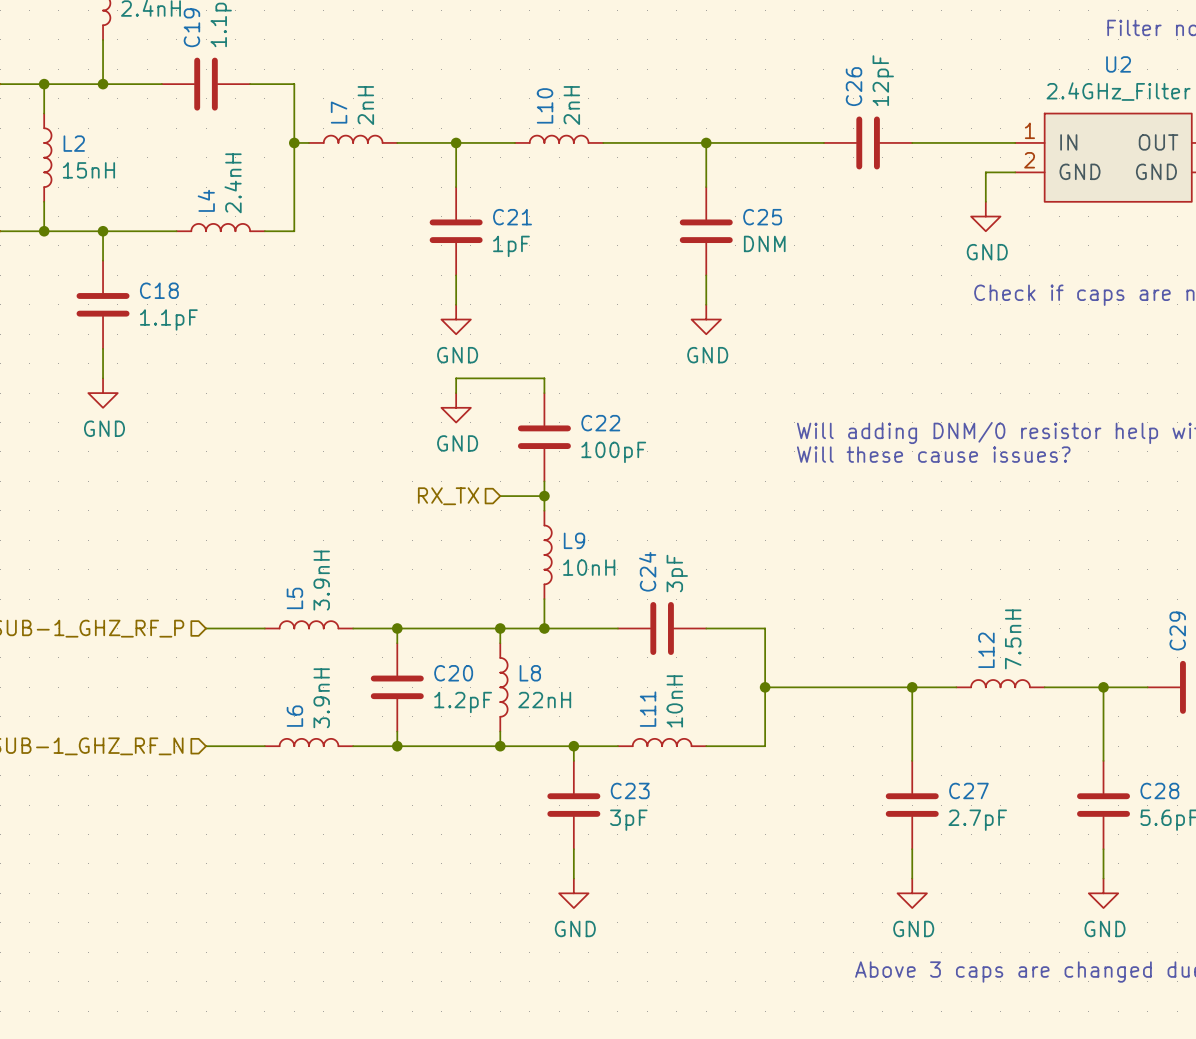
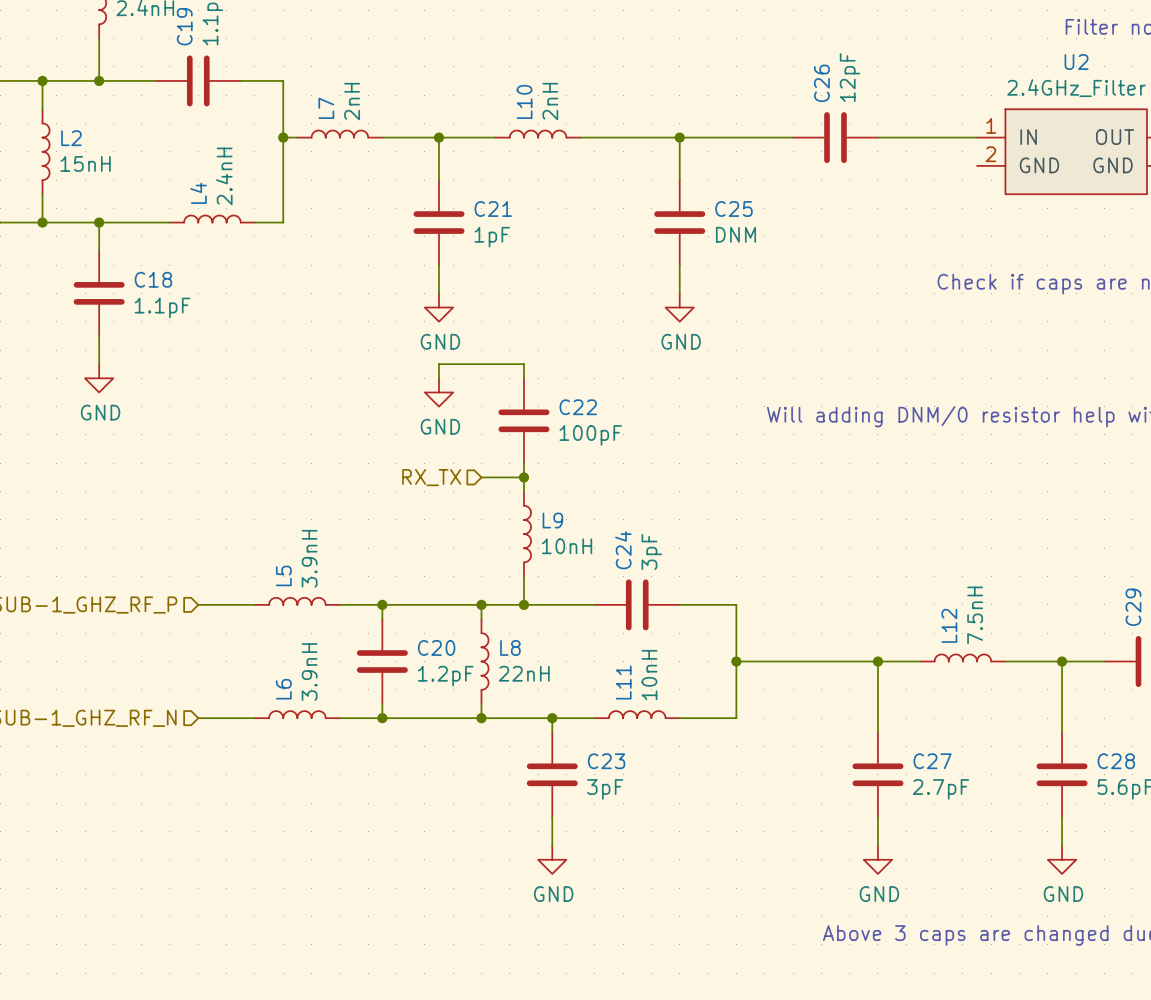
wire: (1015, 172) (985, 172) (985, 201) -> none
power symbol: GND (985, 216) -> none
text: Will these cause issues? (933, 454) -> none

